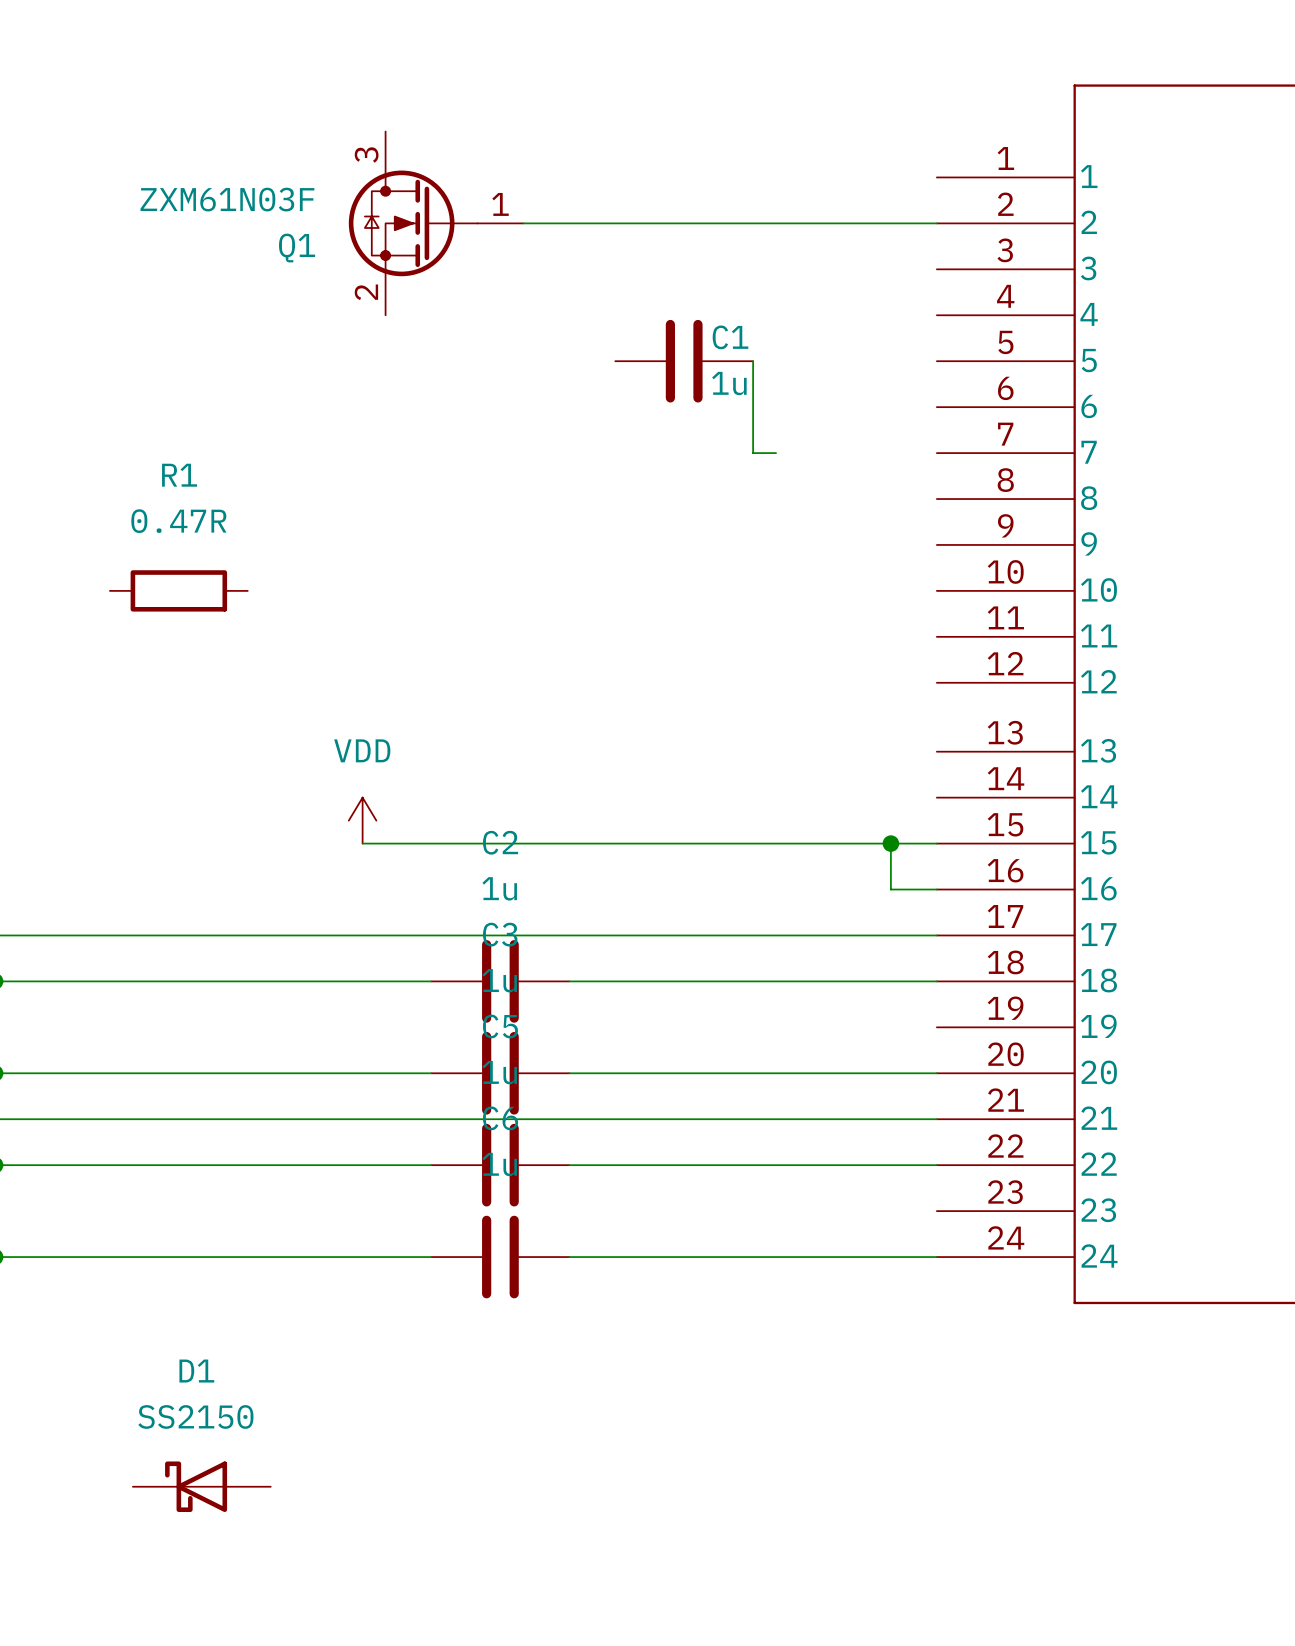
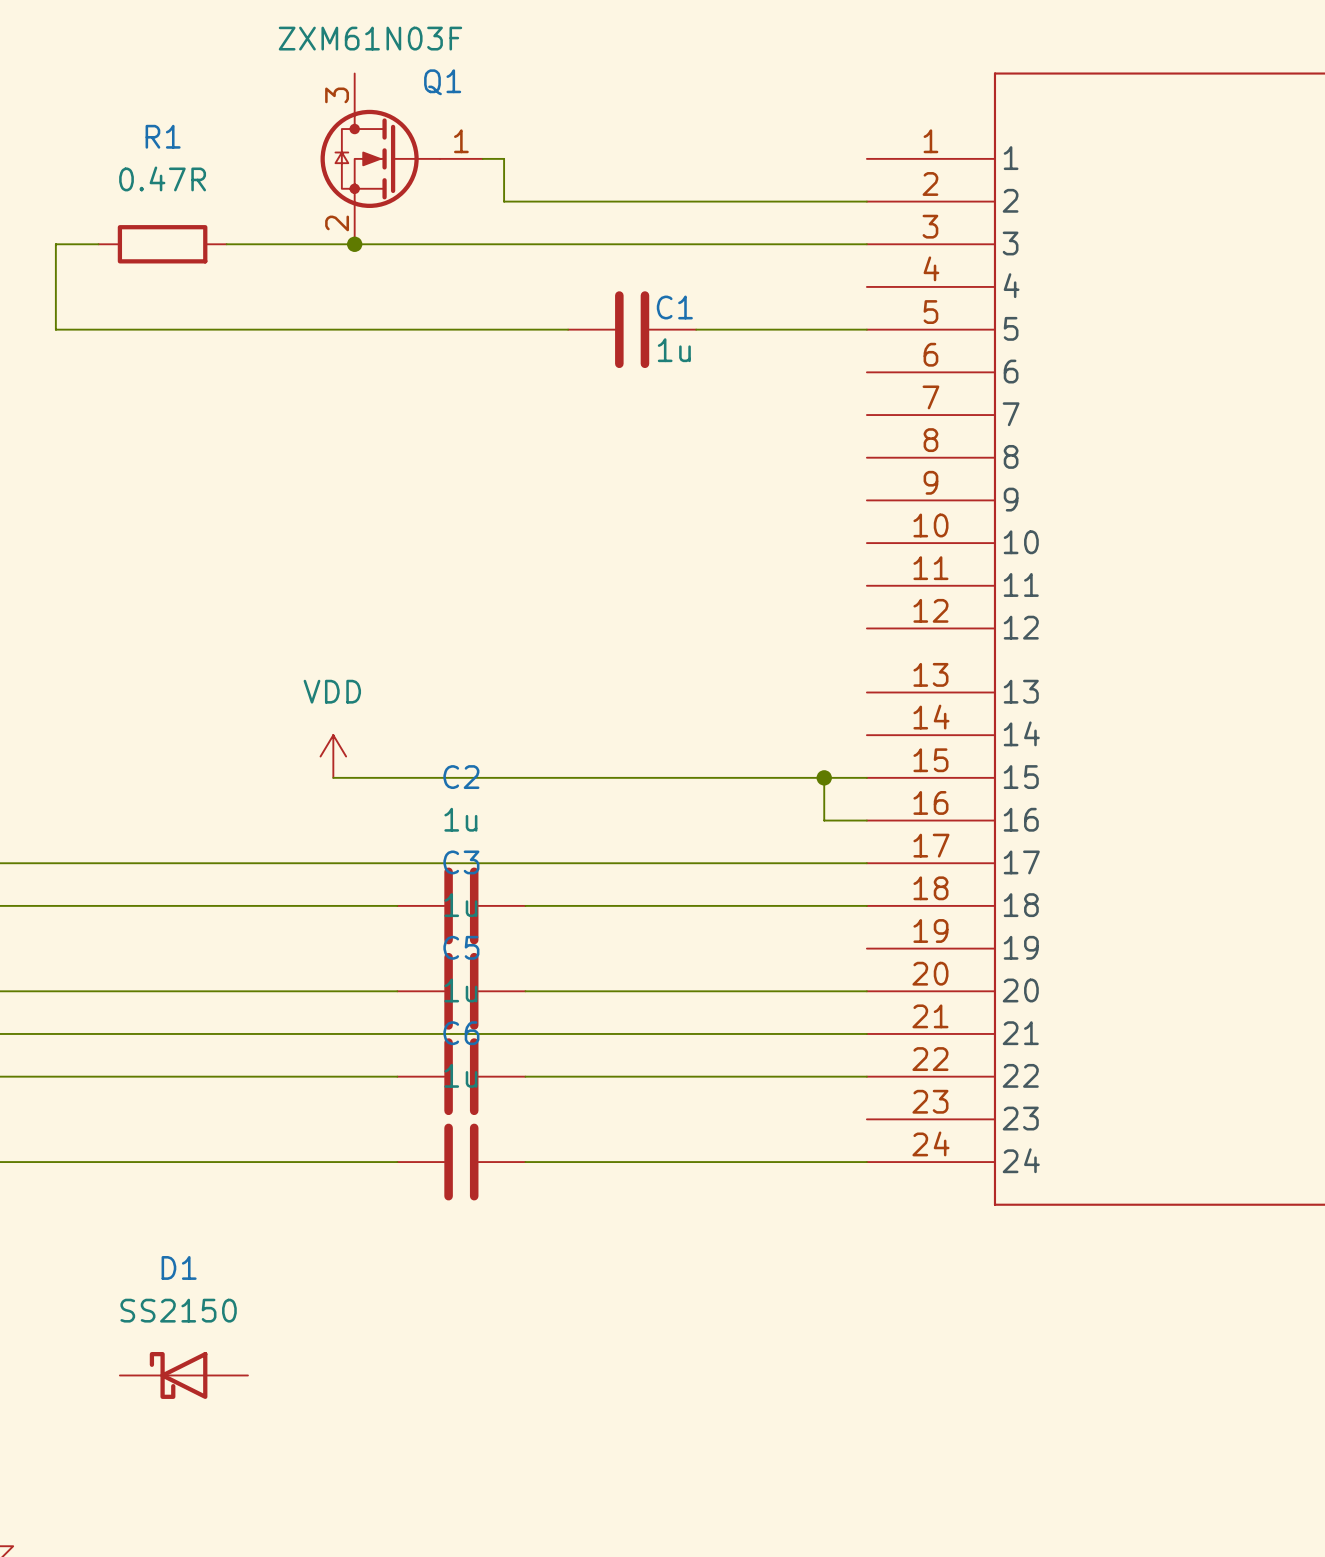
Q1 value position: ZXM61N03F (227, 199) -> ZXM61N03F (370, 38)
Q1 position: (436, 223) -> (401, 158)
wire: (523, 223) (546, 223) -> (482, 158) (504, 158) (504, 201)
Q1 name position: Q1 (297, 248) -> Q1 (442, 82)
wire: none -> (98, 244) (55, 244) (55, 329) (568, 329)
wire: none -> (226, 244) (866, 244)
junction: none -> (354, 244)
wire: (753, 361) (753, 453) (776, 453) -> (696, 329) (866, 329)
R1 position: (178, 590) -> (162, 244)

